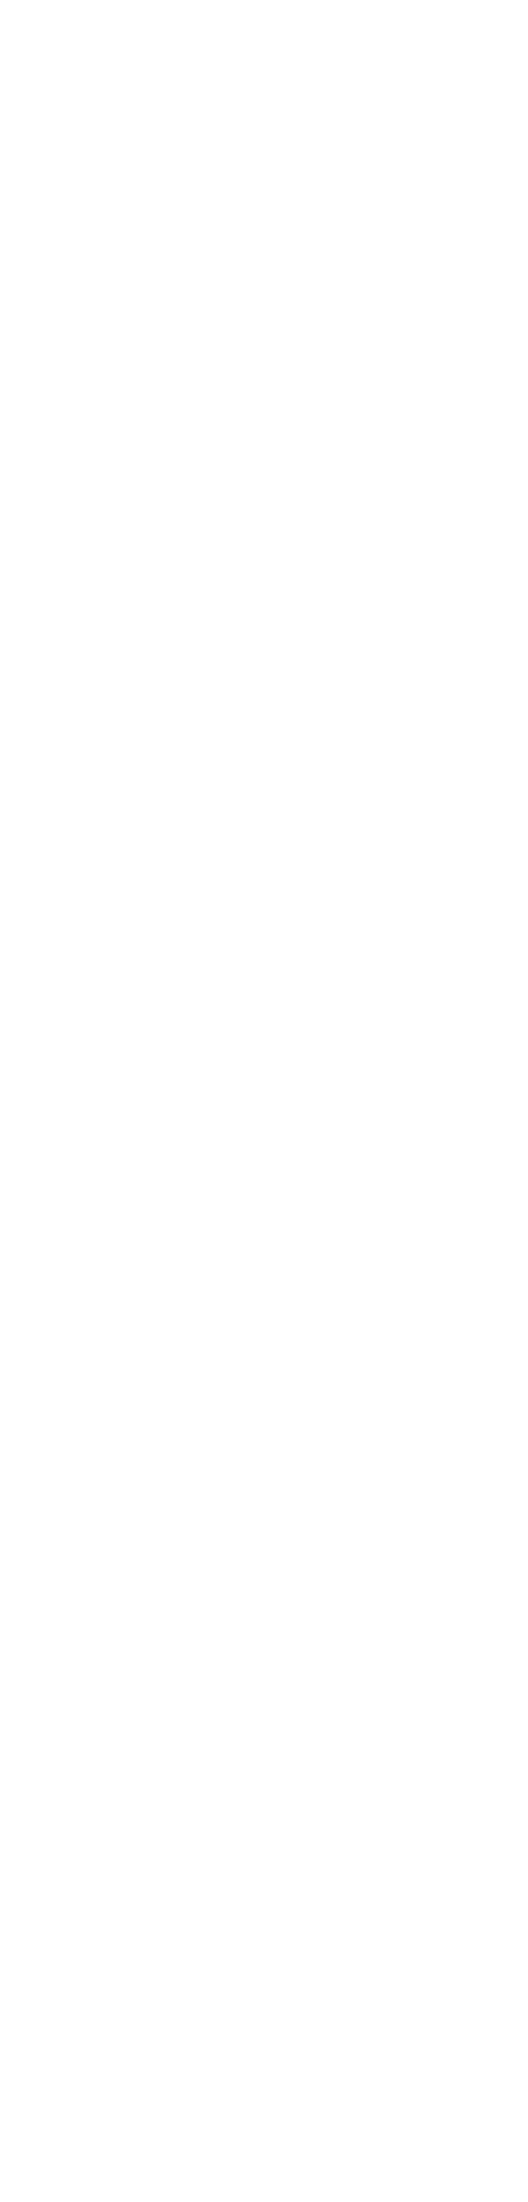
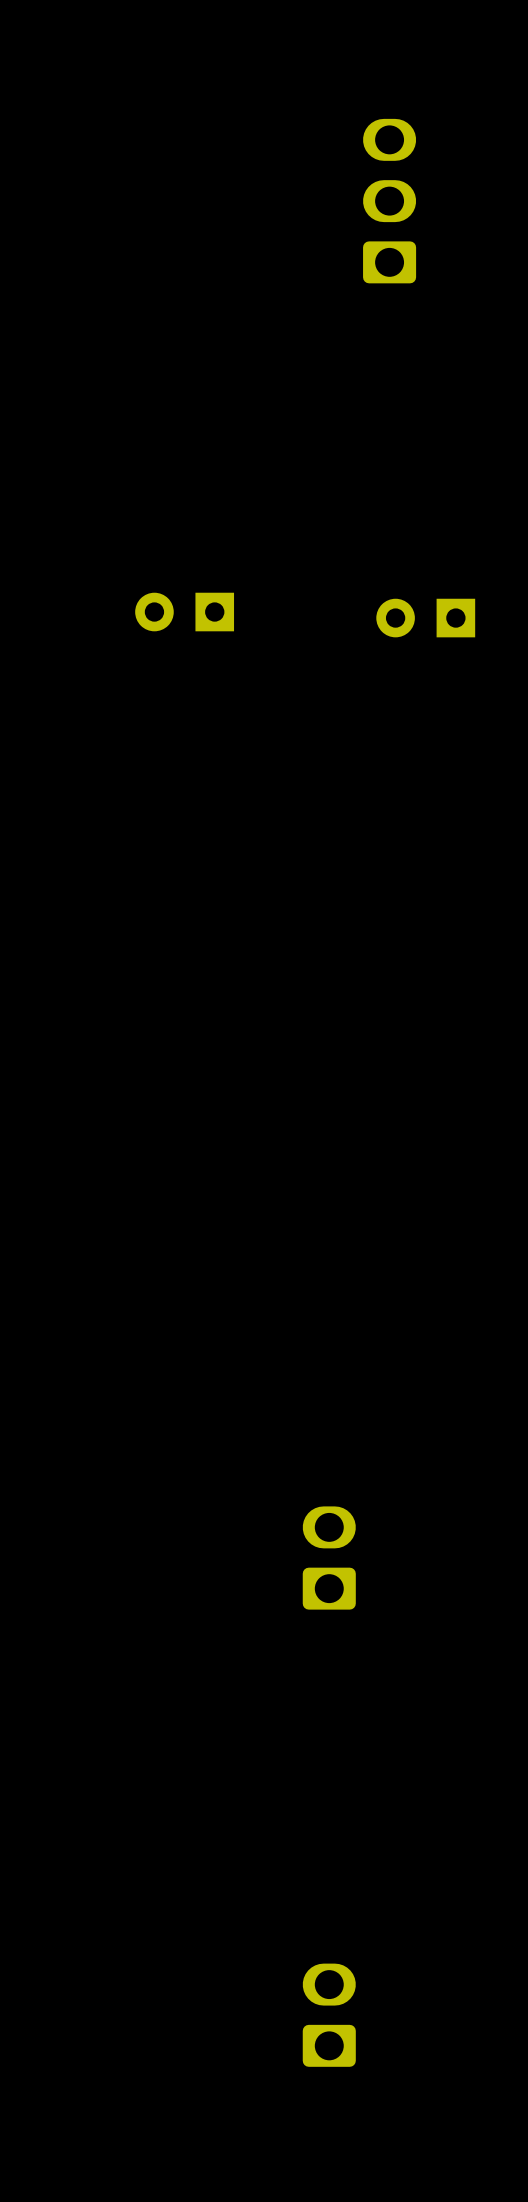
part: none -> (389, 201)
part: none -> (184, 612)
part: none -> (425, 618)
part: none -> (329, 1558)
part: none -> (329, 2015)

